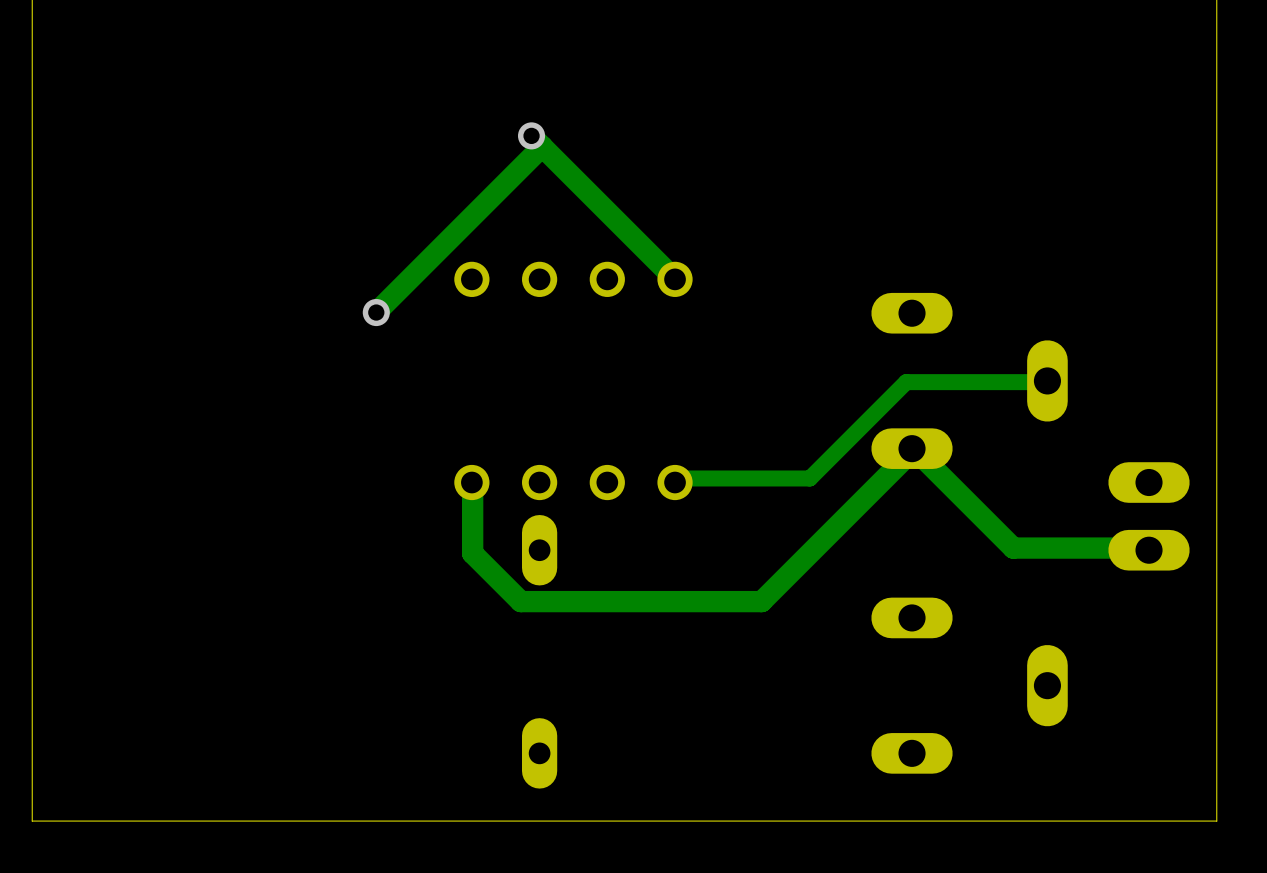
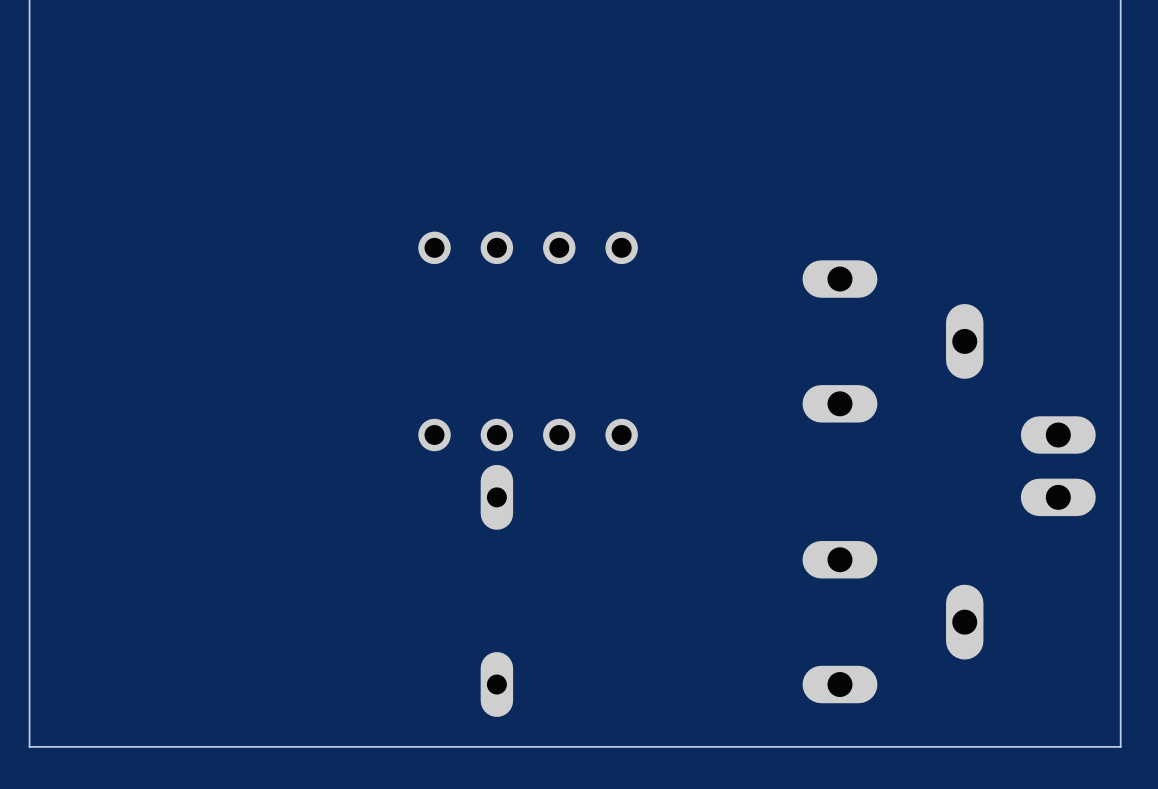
track: (531, 135) (675, 279) -> none
via: (531, 135) -> none
track: (542, 146) (376, 312) -> none
via: (376, 312) -> none
track: (1047, 380) (906, 382) (809, 478) (676, 478) (675, 482) -> none
track: (471, 482) (472, 553) (520, 601) (761, 601) (906, 457) (912, 448) (1013, 548) (1147, 548) (1149, 550) -> none

